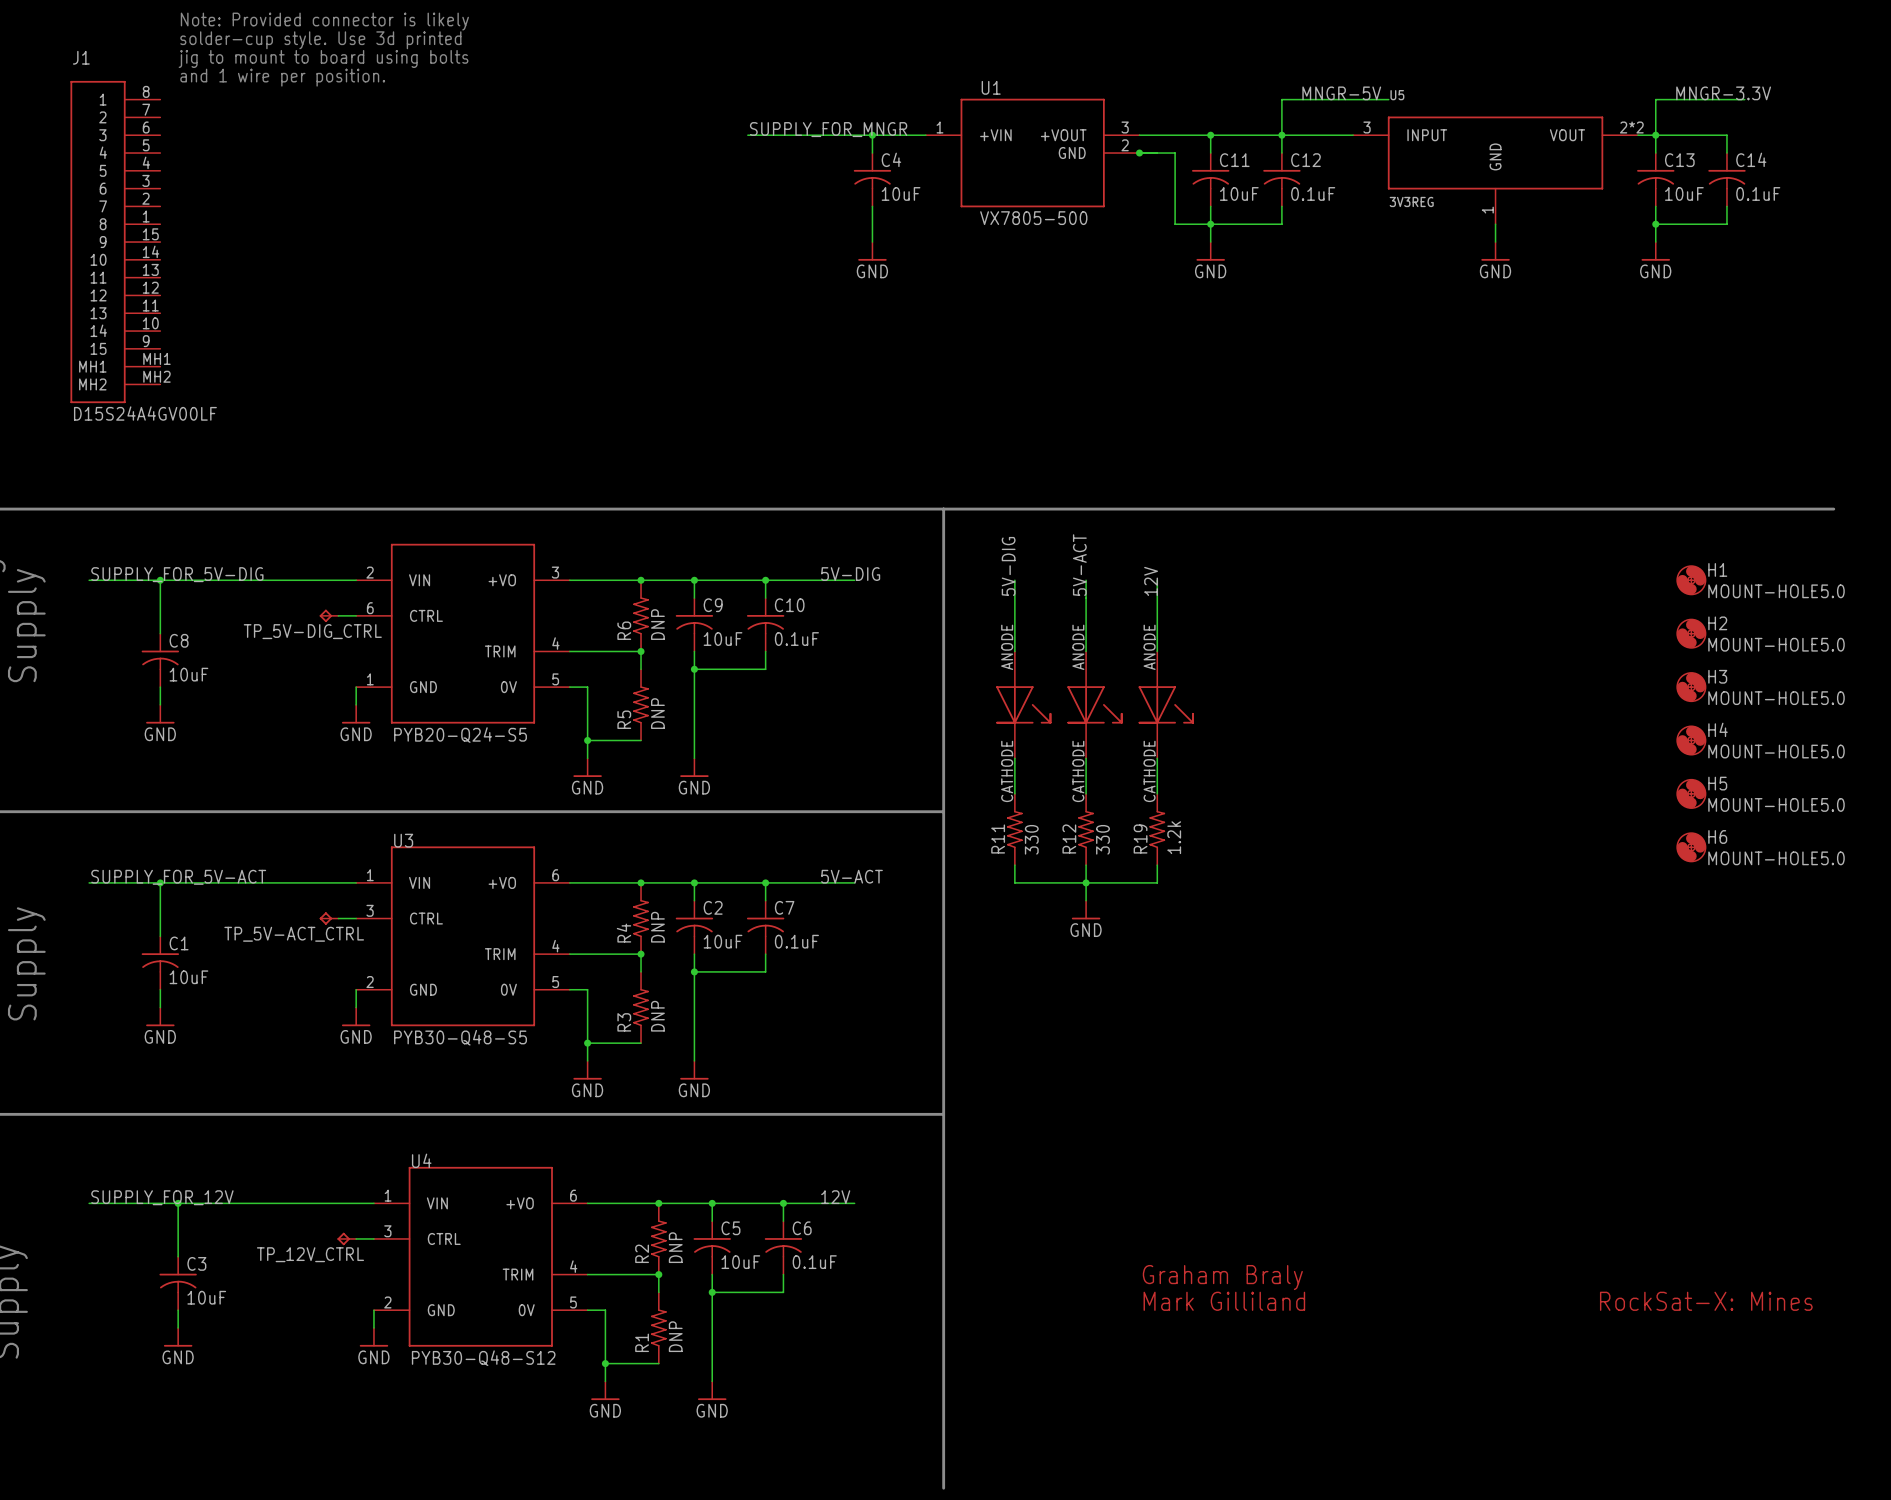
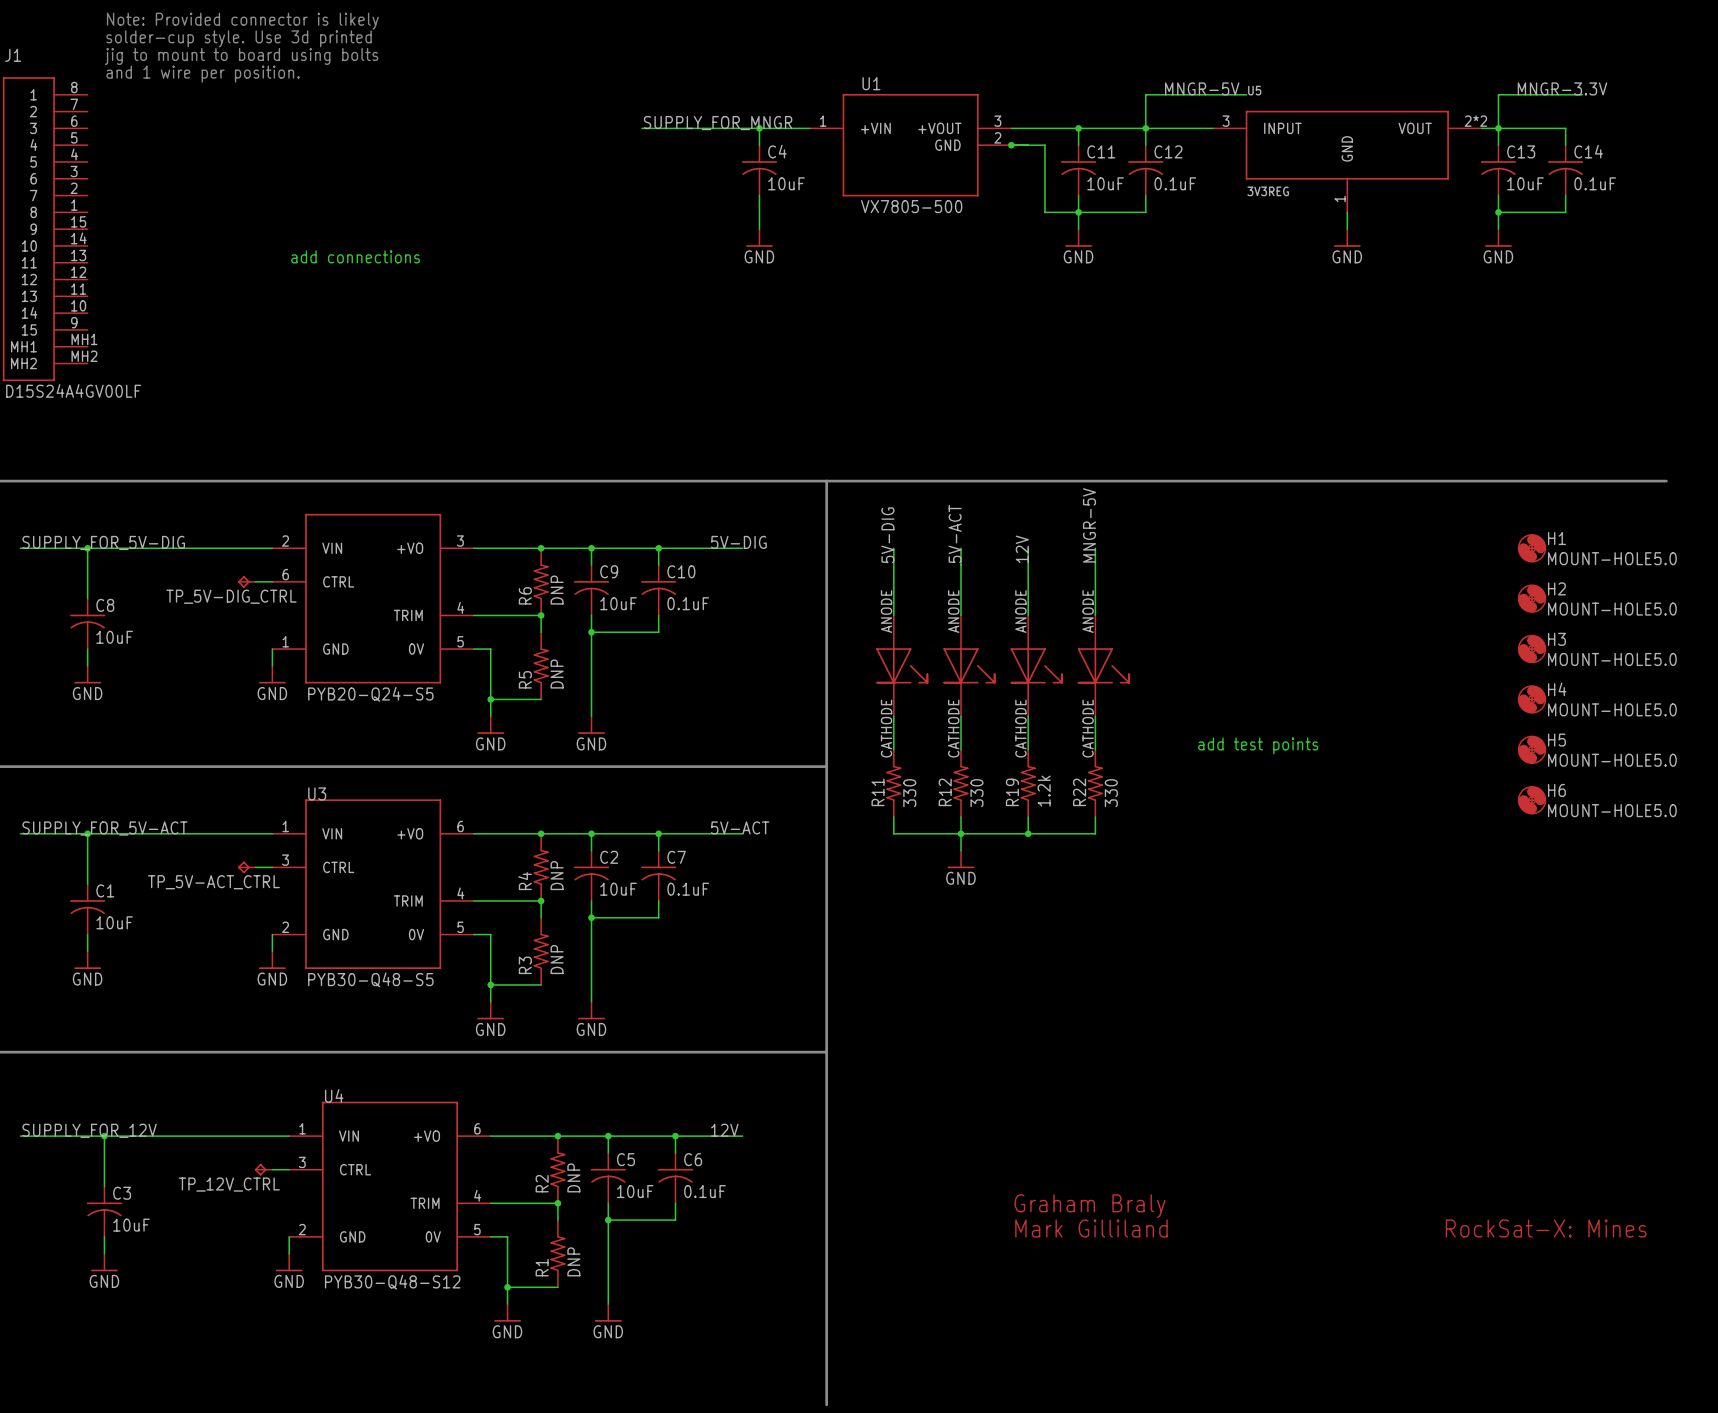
text: none -> add connections (355, 256)
label: none -> MNGR-5V (1089, 525)
wire: none -> (1095, 548) (1095, 615)
part: none -> (1103, 665)
wire: none -> (1095, 716) (1095, 749)
text: none -> add test points (1258, 745)
R22: none -> 330 (1095, 783)
wire: none -> (1095, 817) (1095, 833) (1028, 833)
junction: none -> (1028, 833)

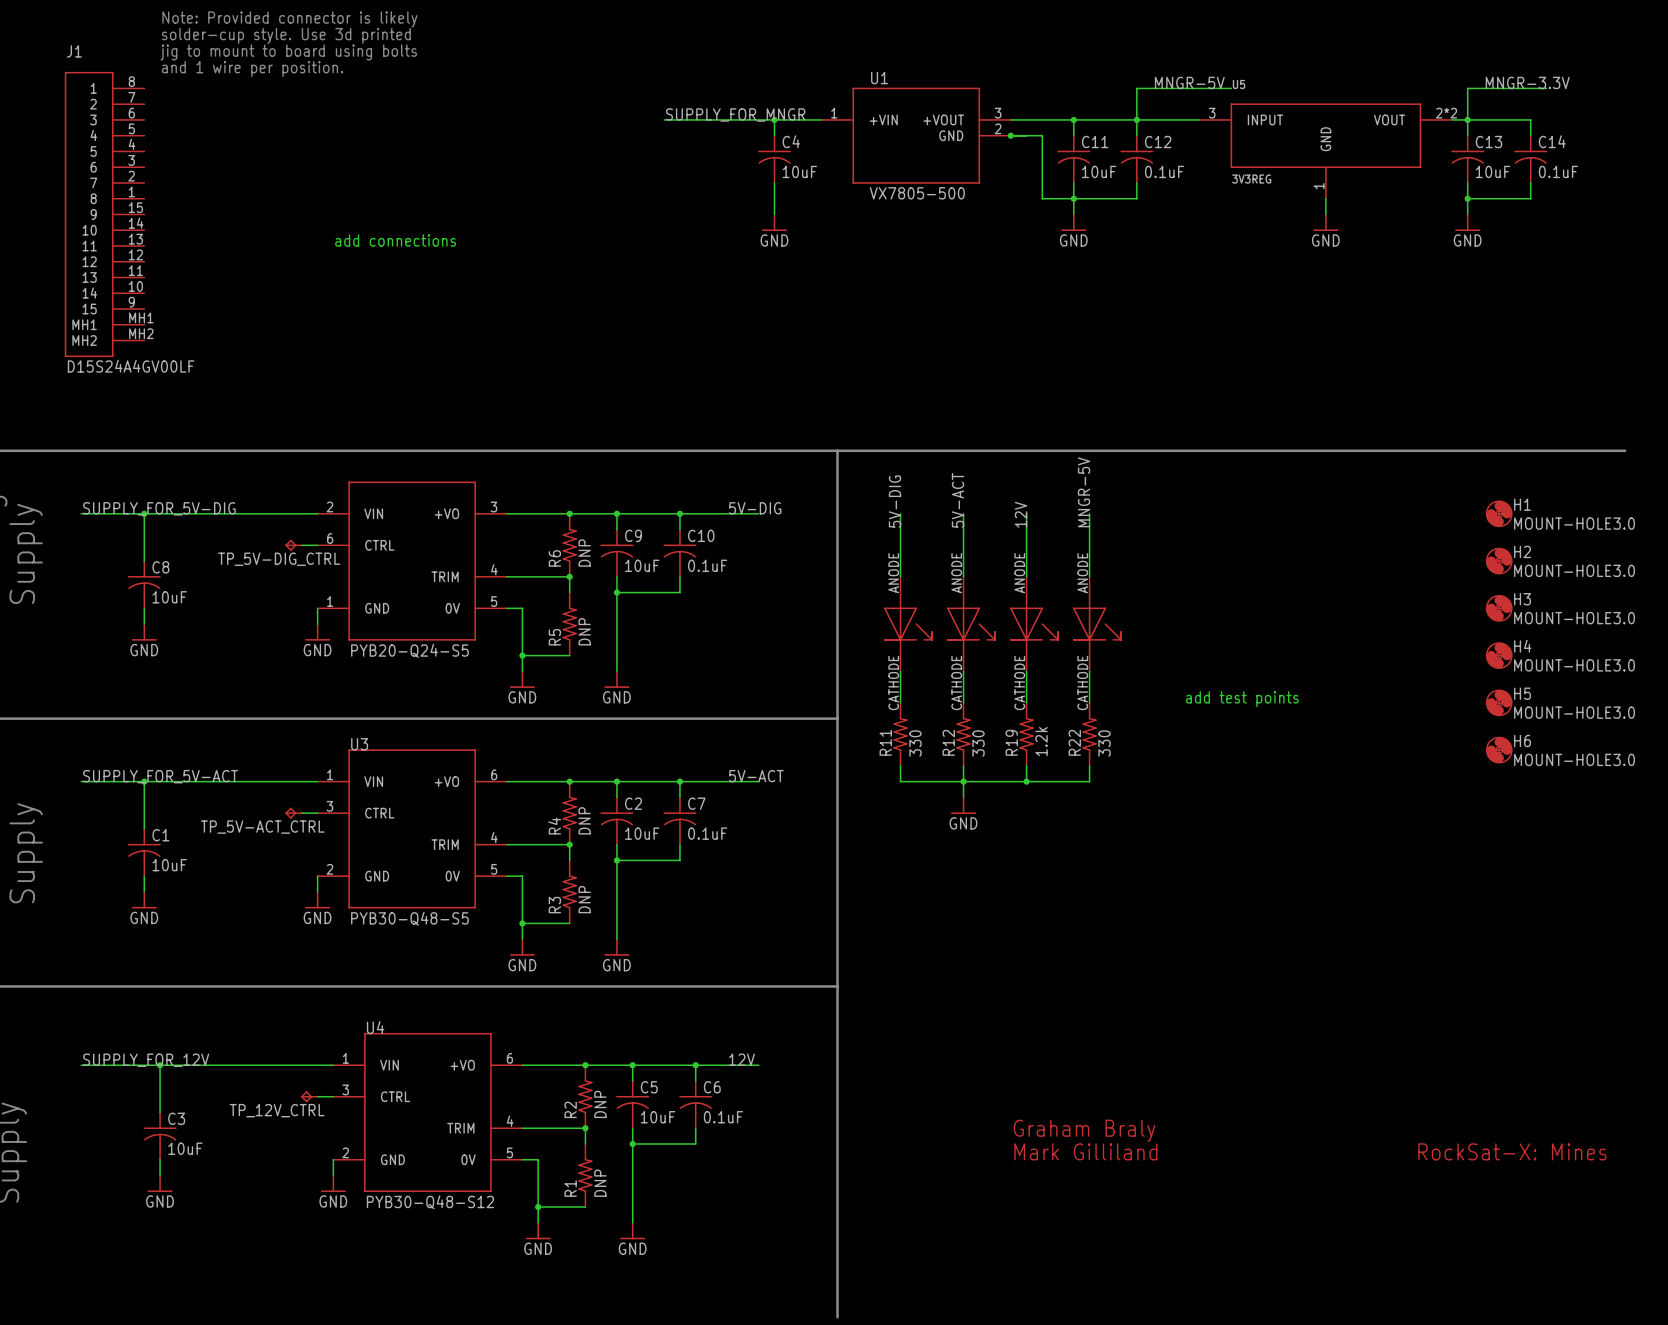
H1 value: MOUNT-HOLE5.0 (1612, 558) -> MOUNT-HOLE3.0 (1574, 523)
H2 value: MOUNT-HOLE5.0 (1612, 609) -> MOUNT-HOLE3.0 (1574, 570)
H3 value: MOUNT-HOLE5.0 (1612, 659) -> MOUNT-HOLE3.0 (1574, 618)
H4 value: MOUNT-HOLE5.0 (1612, 709) -> MOUNT-HOLE3.0 (1574, 665)
H5 value: MOUNT-HOLE5.0 (1612, 760) -> MOUNT-HOLE3.0 (1574, 712)
H6 value: MOUNT-HOLE5.0 (1612, 810) -> MOUNT-HOLE3.0 (1574, 759)

